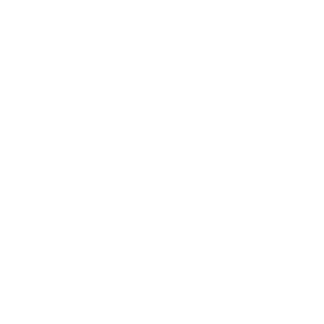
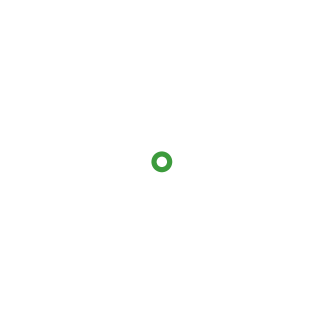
via: none -> (161, 161)

